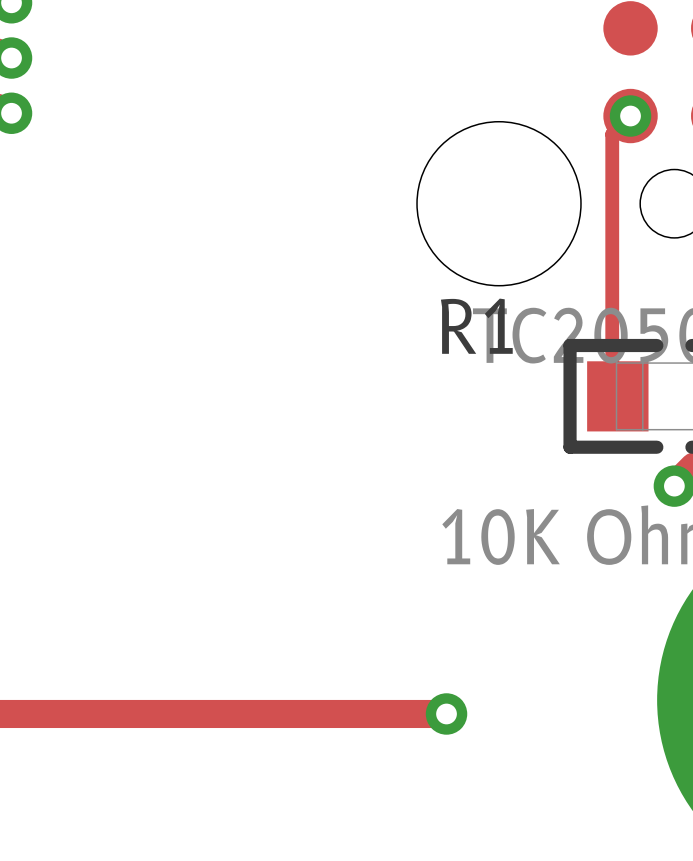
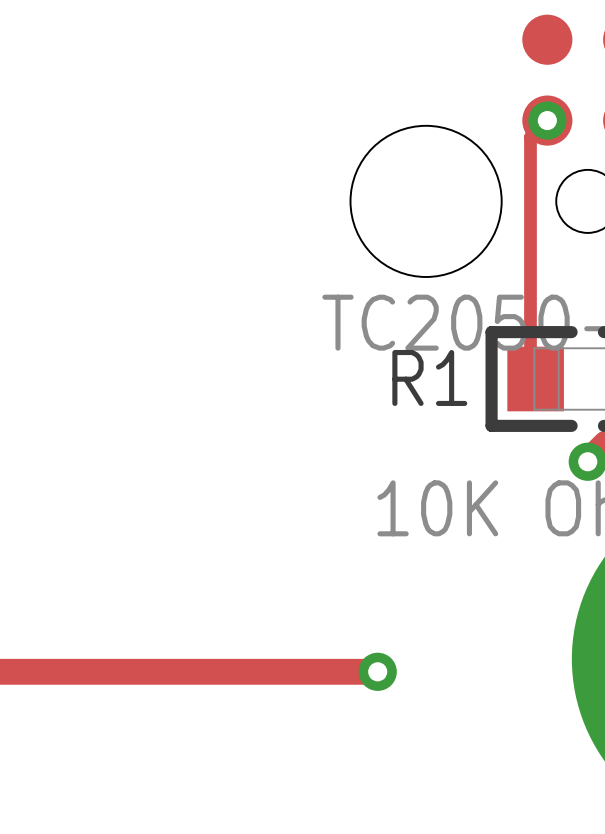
R1 name position: R1 (476, 326) -> R1 (429, 377)

